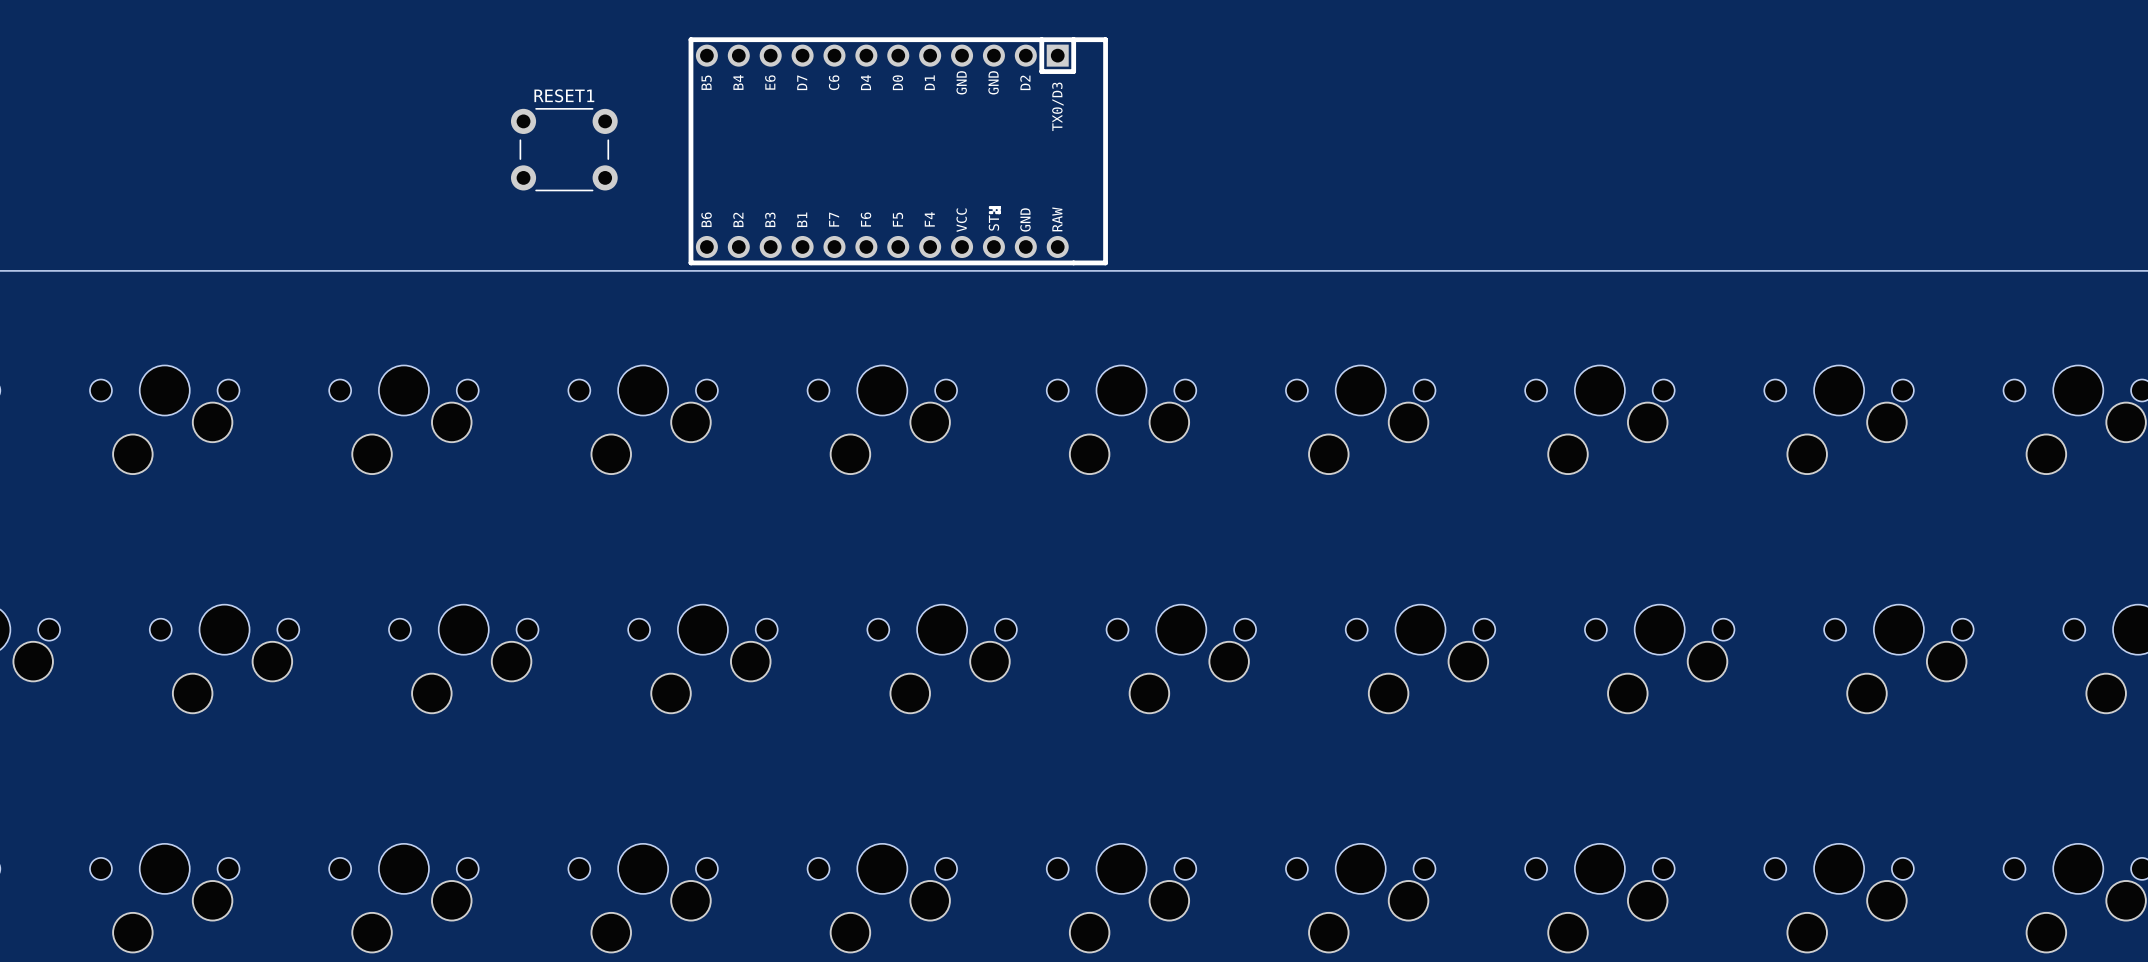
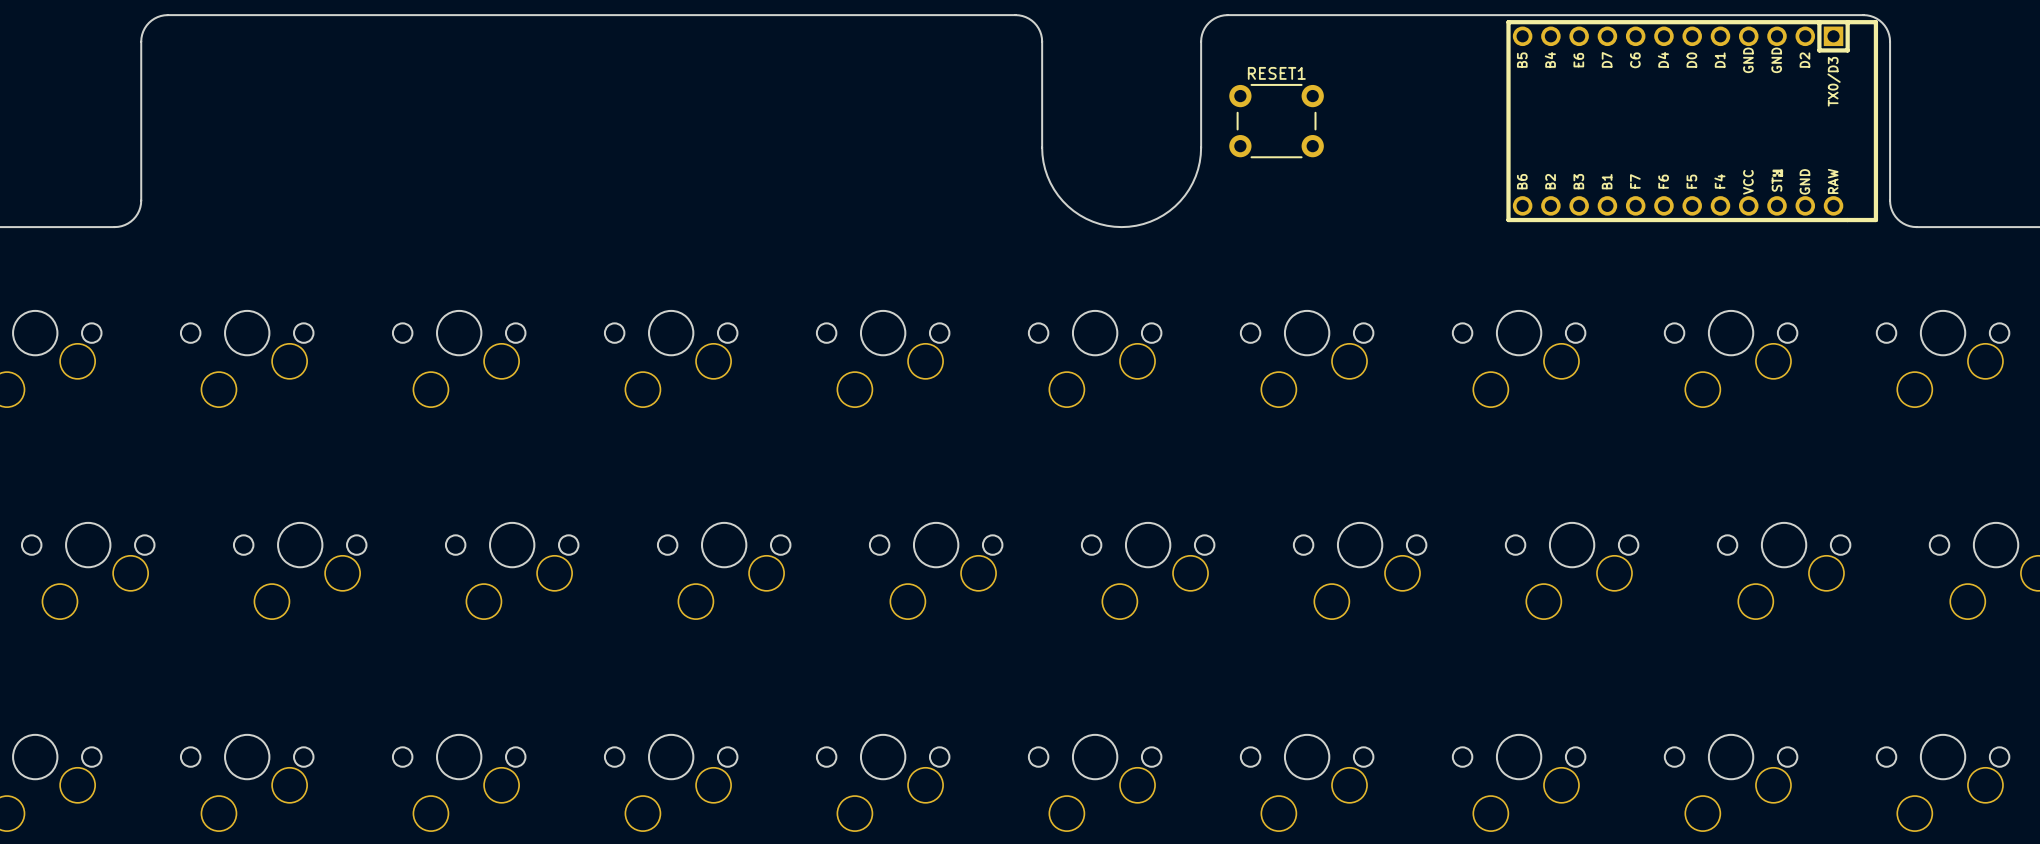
RESET1 position: (564, 149) -> (1276, 121)
part: (898, 151) -> none
part: none -> (1692, 121)
board edge: (15, 270) (2048, 270) -> (114, 227) (130, 221) (140, 207) (141, 38) (144, 28) (151, 20) (167, 15) (1022, 16) (1036, 25) (1041, 38) (1042, 154) (1050, 183) (1062, 201) (1079, 215) (1099, 224) (1121, 227) (1143, 224) (1163, 215) (1180, 201) (1192, 183) (1200, 154) (1201, 38) (1208, 22) (1220, 16) (1867, 15) (1882, 22) (1889, 38) (1890, 207) (1900, 221) (1916, 227)

